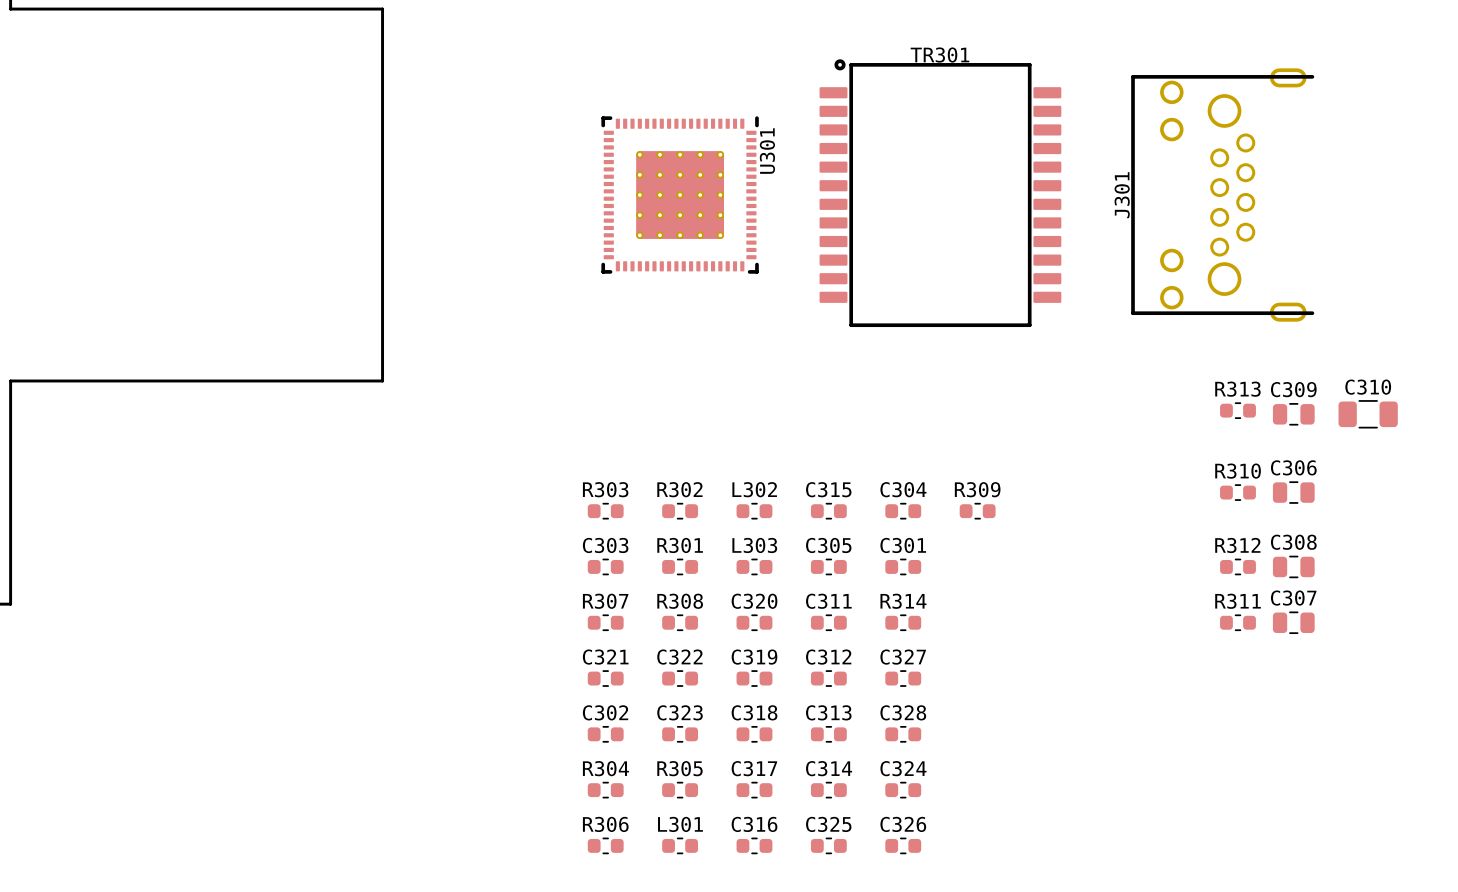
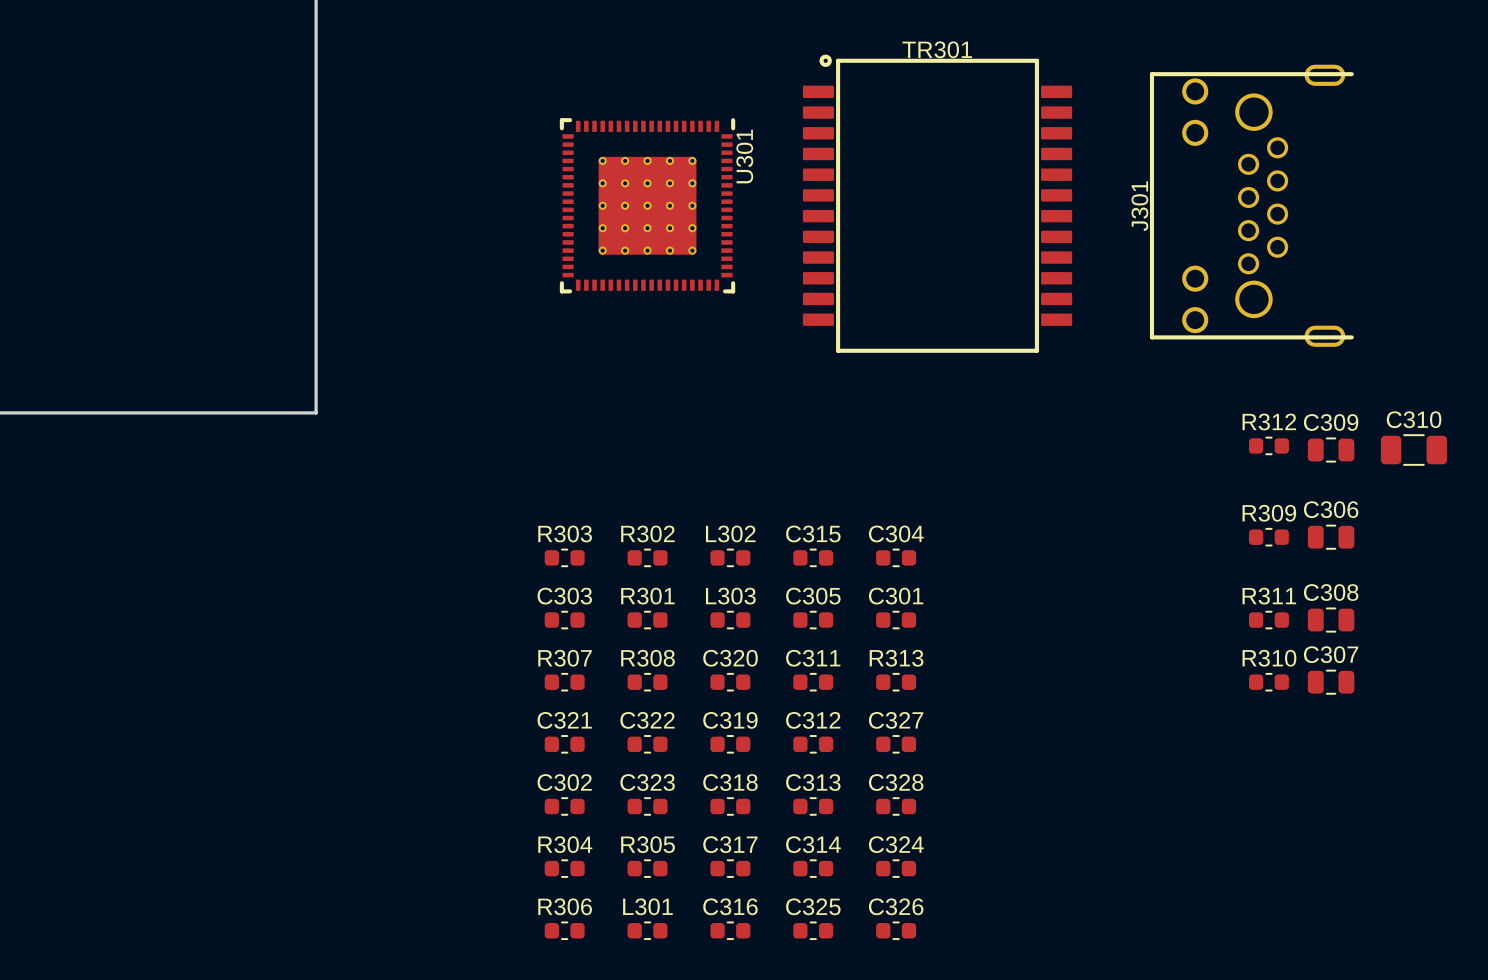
R313 name: R313 (1237, 389) -> R312 (1269, 422)
R310 name: R310 (1238, 471) -> R309 (1269, 513)
R309: (977, 511) -> none
R312 name: R312 (1237, 545) -> R311 (1269, 596)
R314 name: R314 (903, 601) -> R313 (896, 658)
R311 name: R311 (1238, 601) -> R310 (1269, 658)

